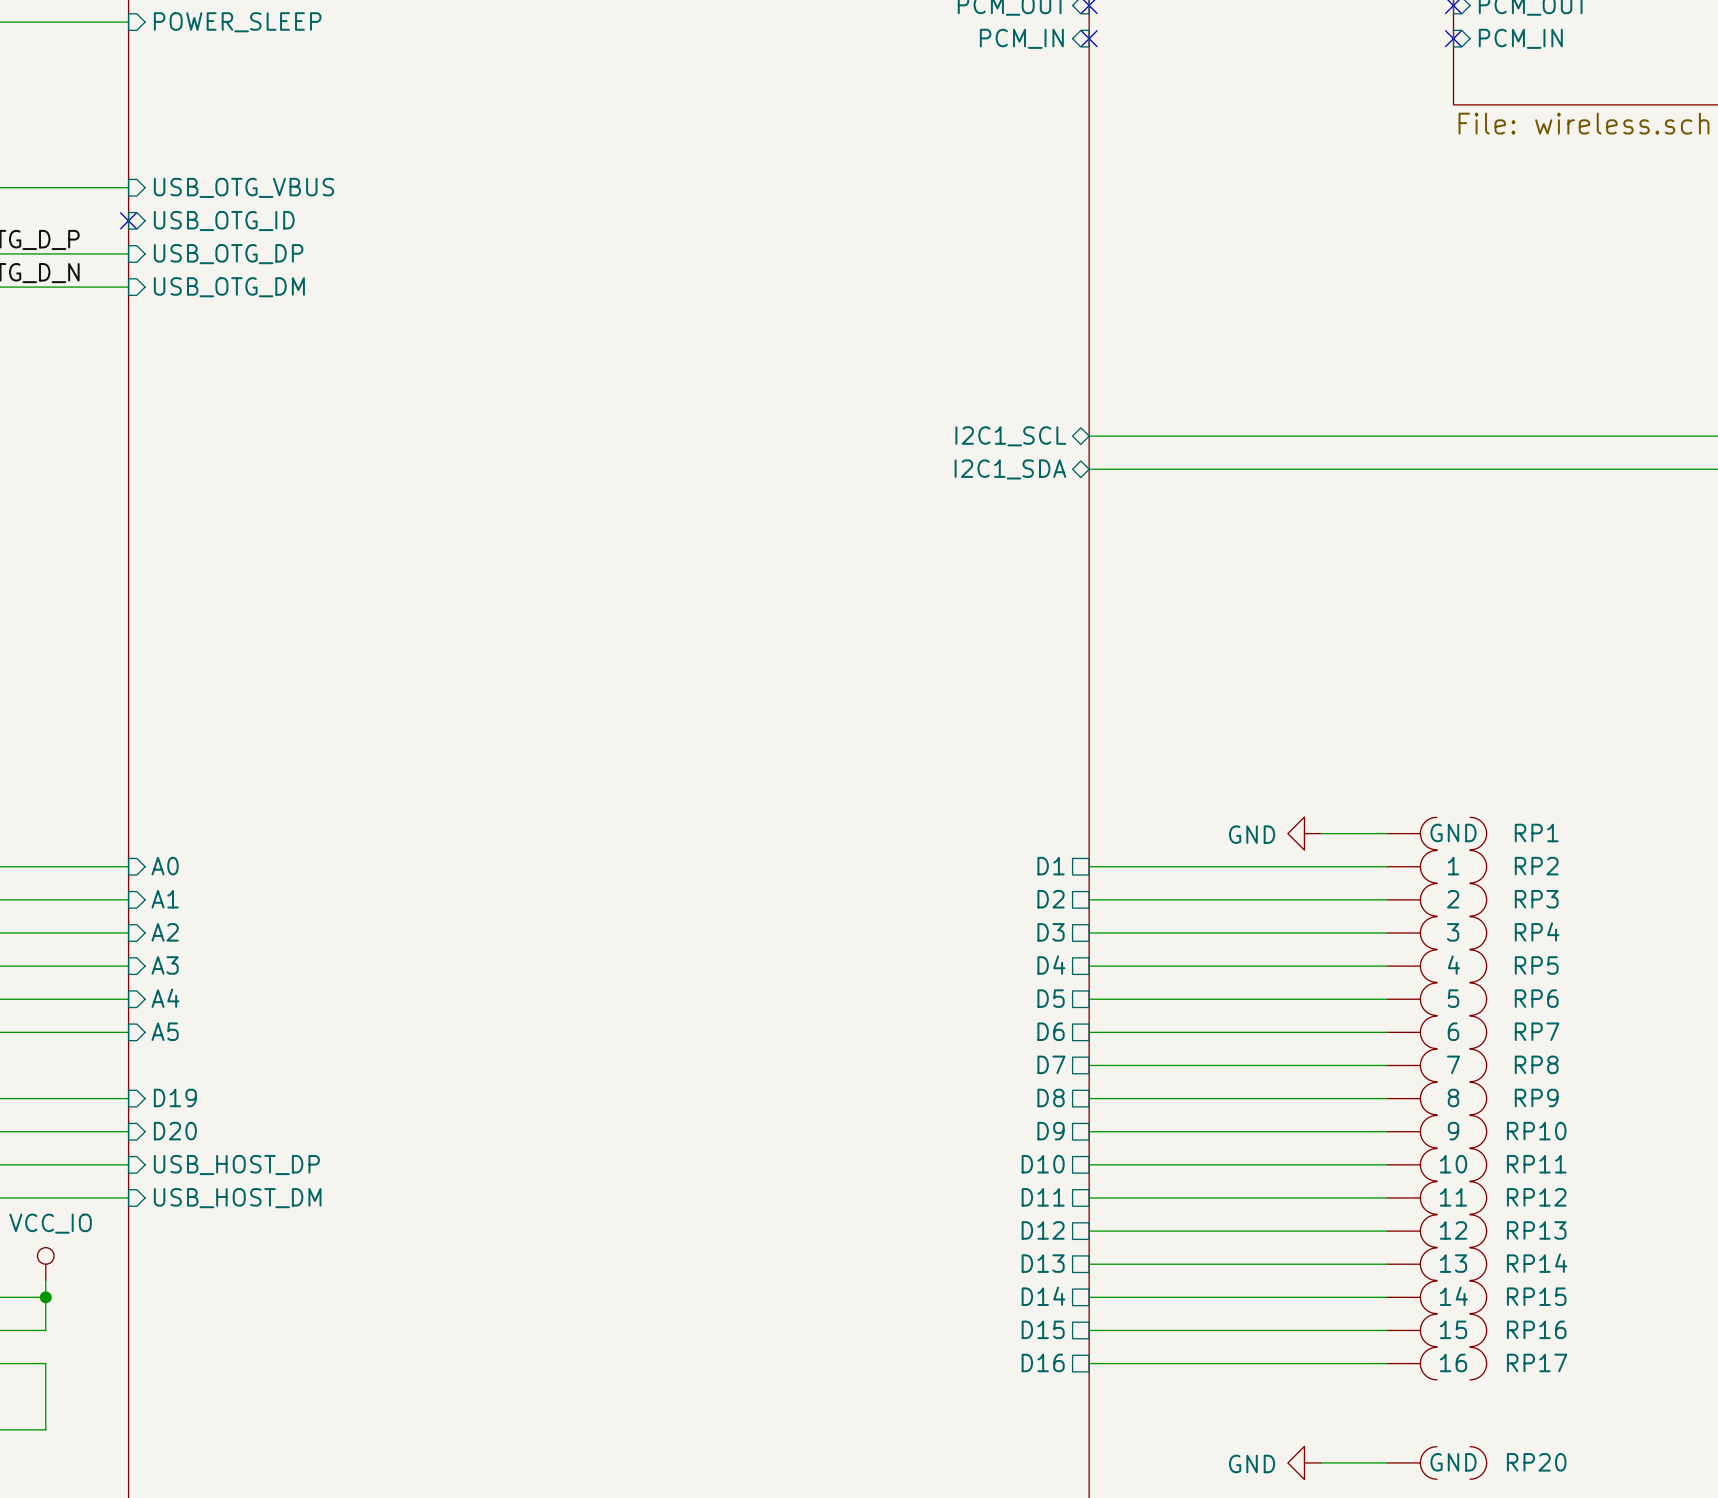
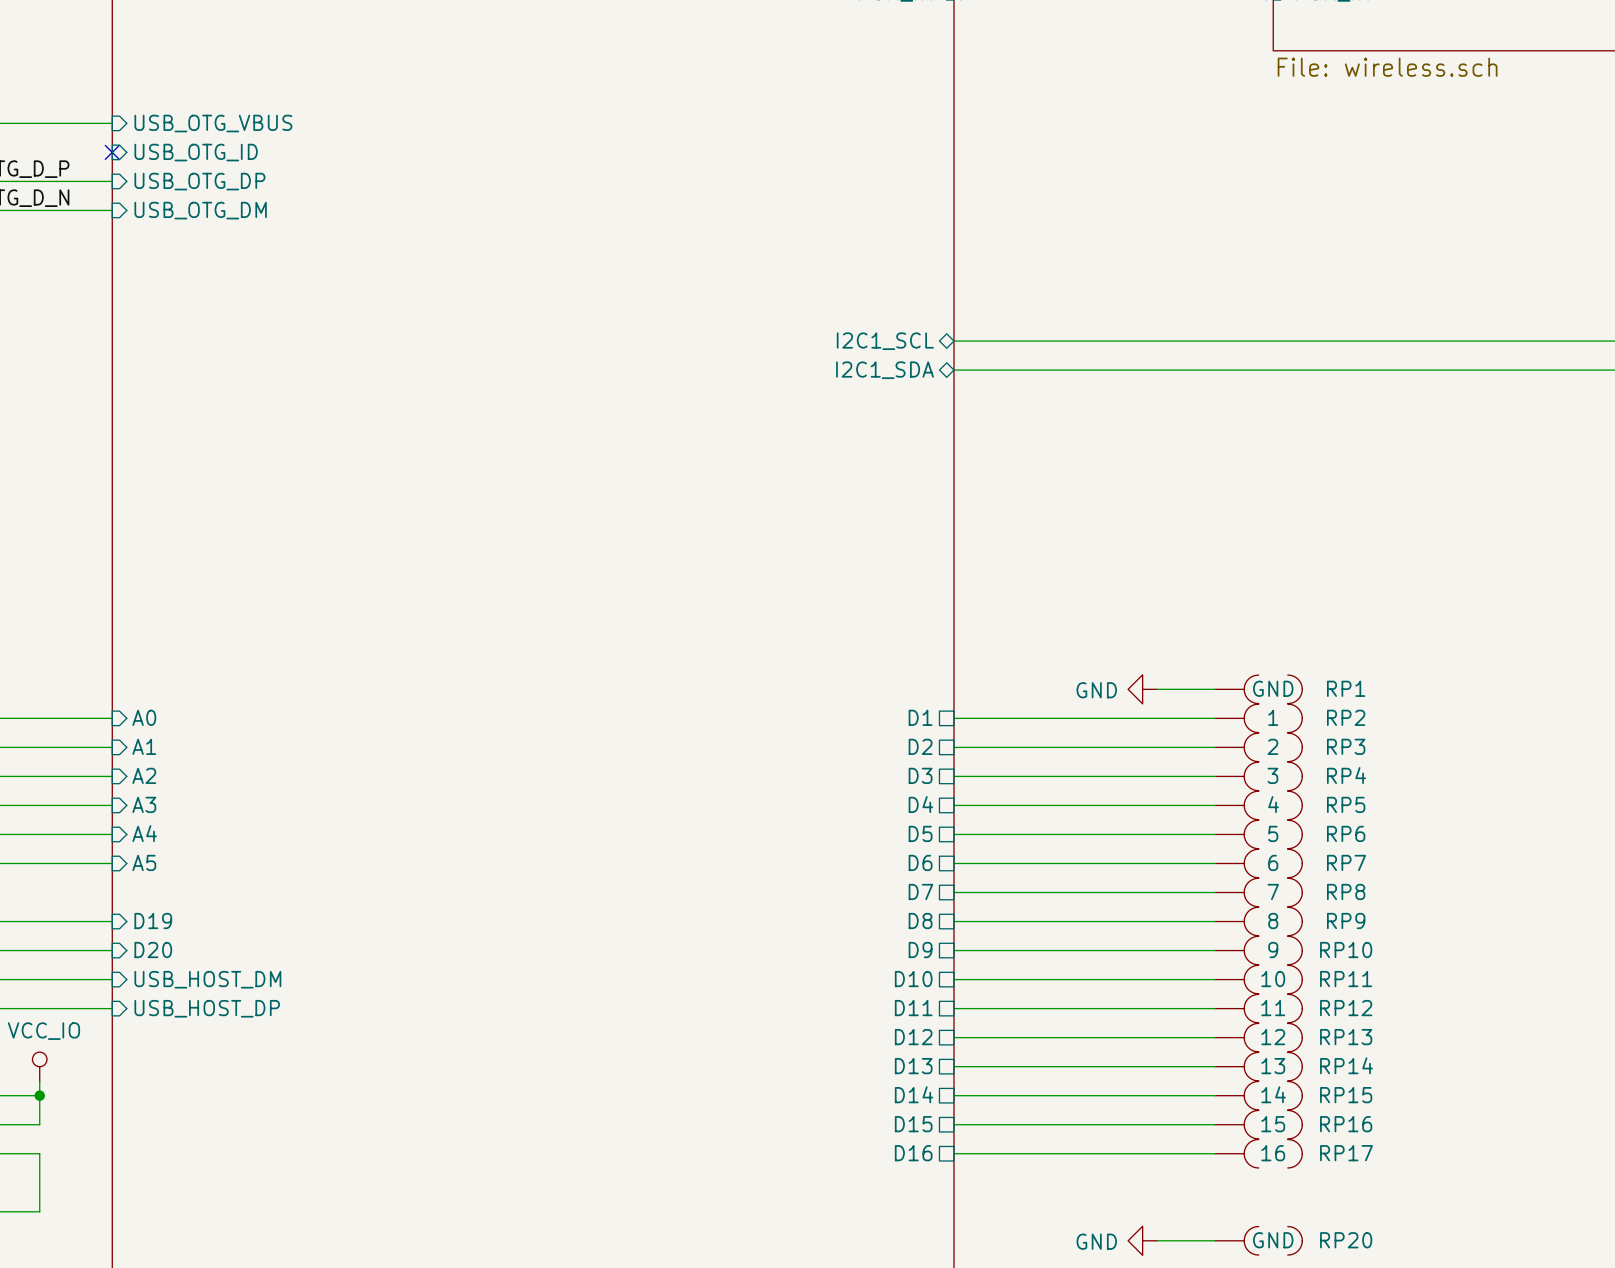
sheet pin: USB_HOST_DP (236, 1165) -> USB_HOST_DM (207, 979)
sheet pin: USB_HOST_DM (237, 1198) -> USB_HOST_DP (207, 1008)

